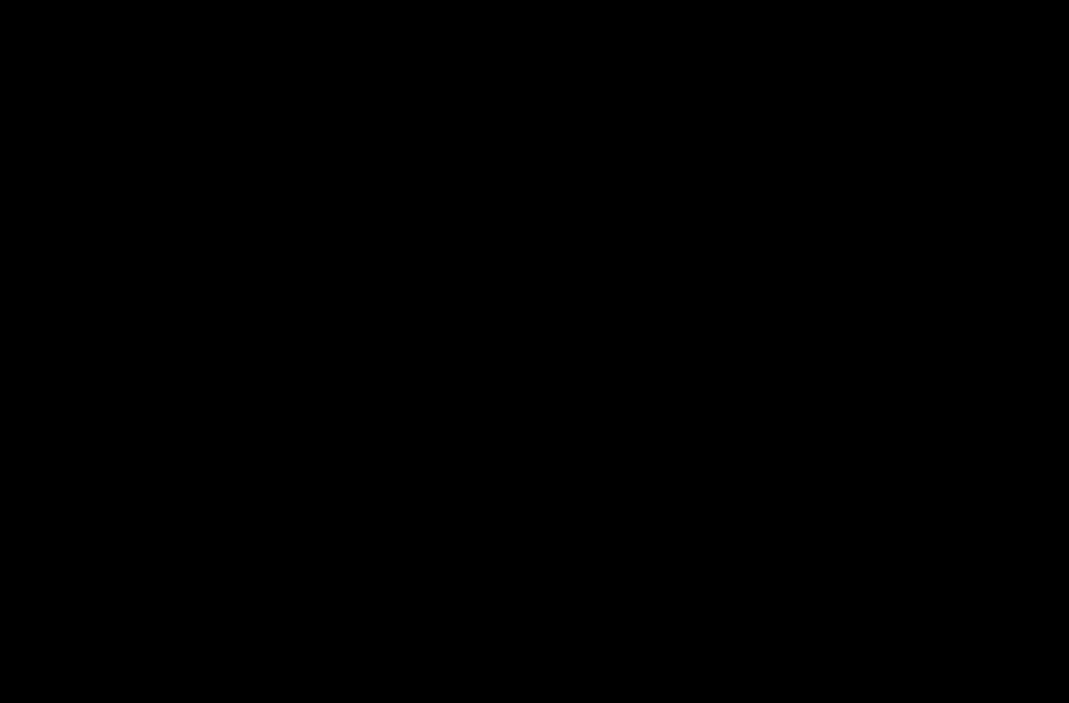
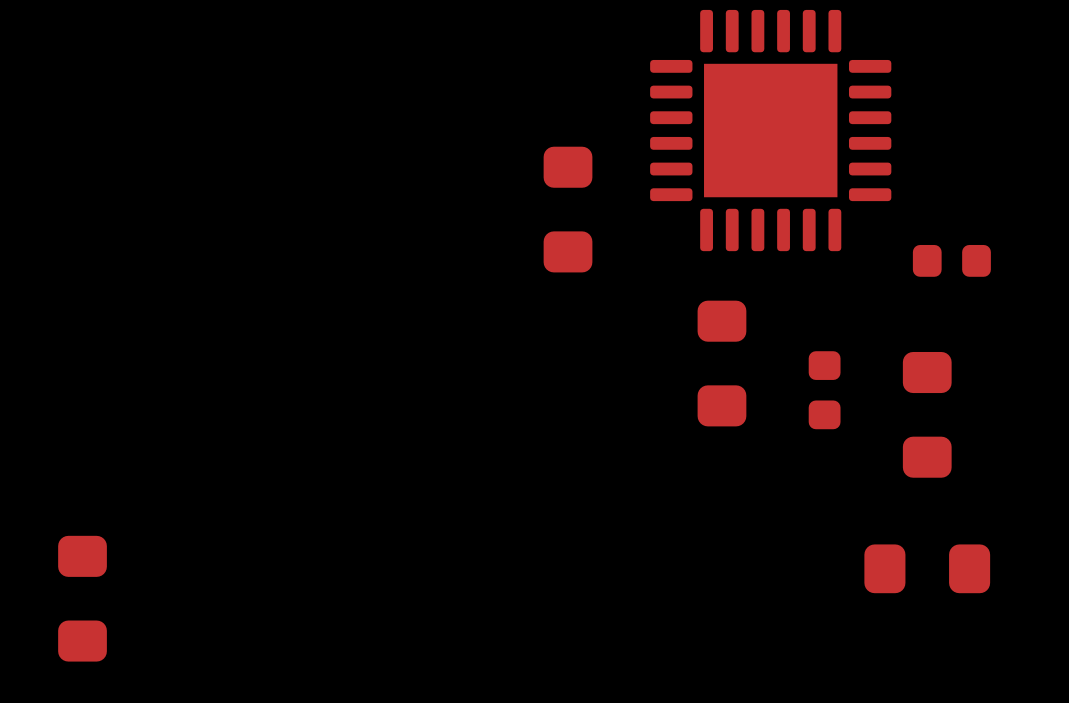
part: none -> (770, 130)
part: none -> (568, 209)
part: none -> (951, 260)
part: none -> (721, 363)
part: none -> (824, 390)
part: none -> (927, 414)
part: none -> (927, 568)
part: none -> (82, 598)

